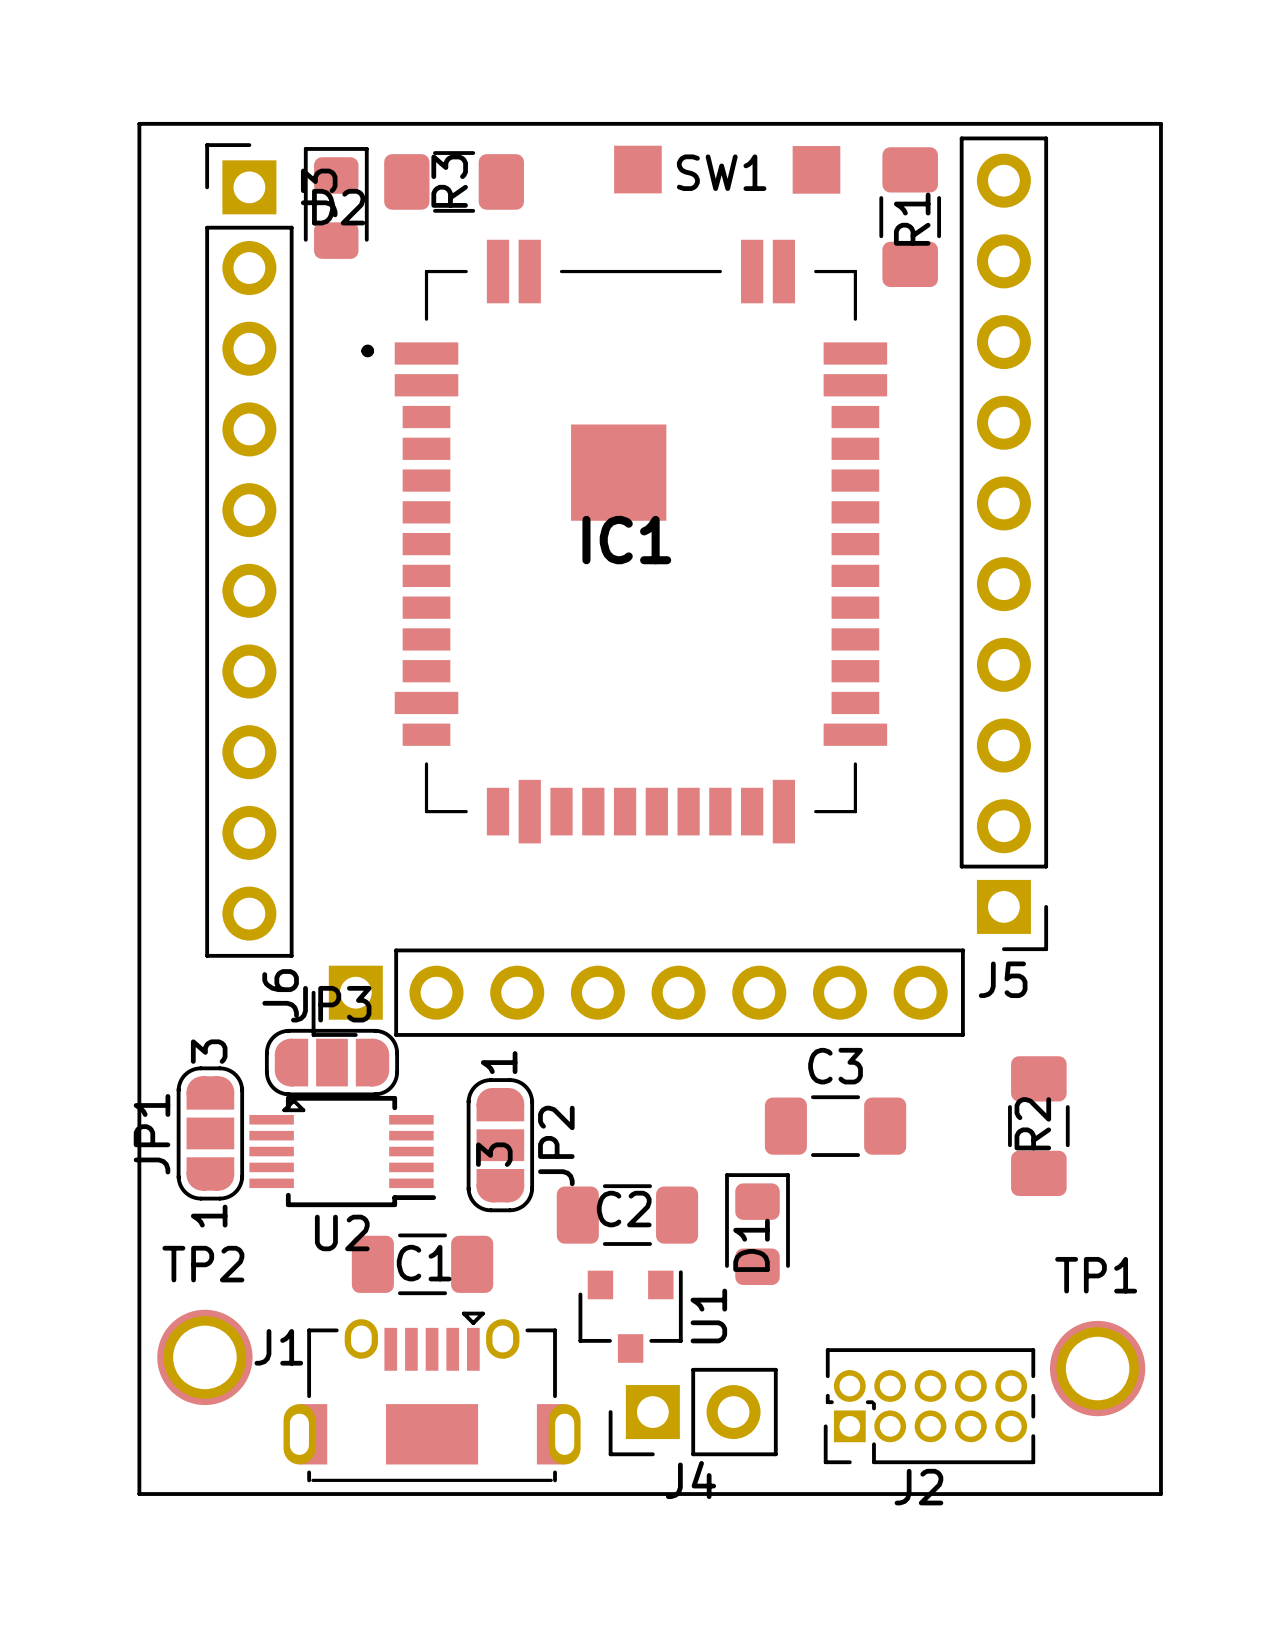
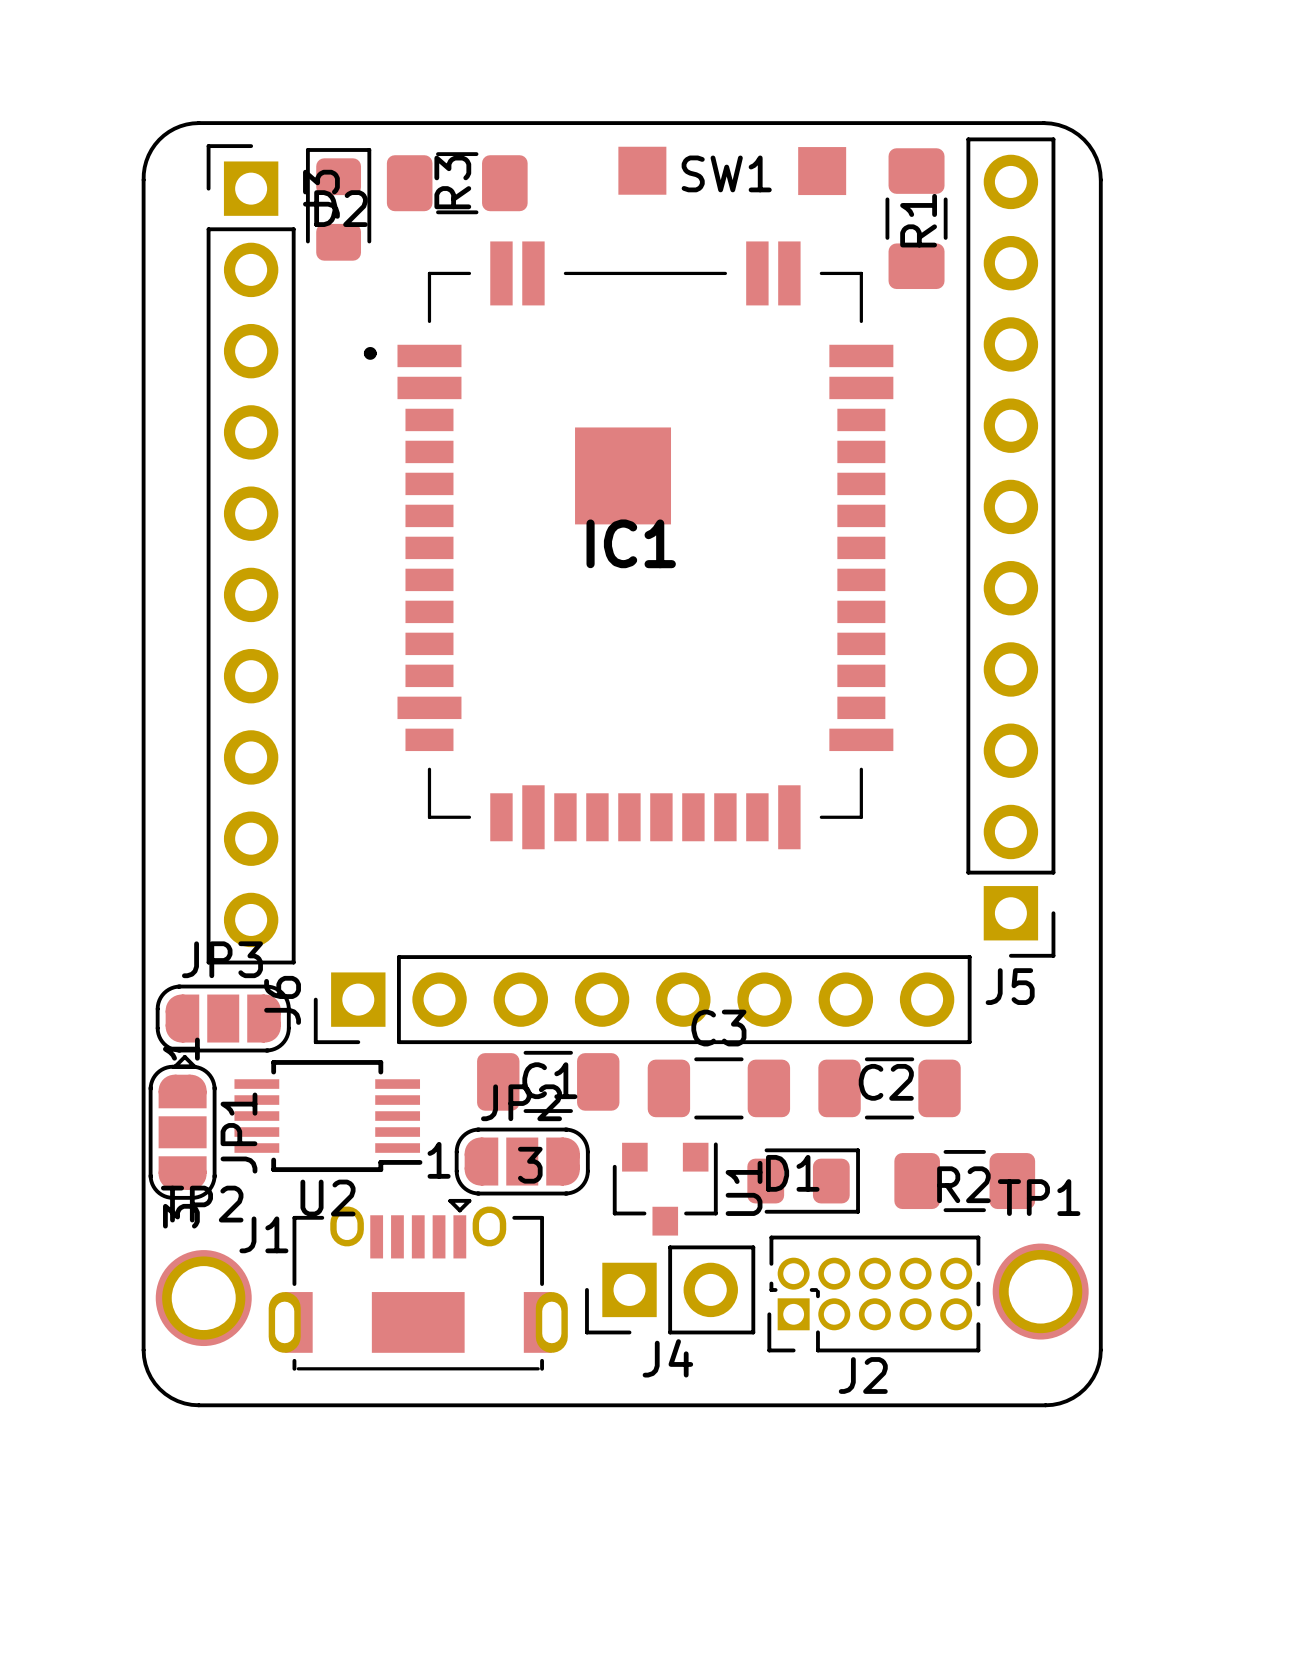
board edge: (139, 123) (139, 1494) (1160, 1494) (1160, 123) (139, 123) -> (198, 123) (174, 128) (159, 139) (148, 155) (143, 173) (143, 1350) (145, 1364) (155, 1383) (171, 1397) (184, 1403) (198, 1405) (1045, 1405) (1066, 1401) (1079, 1393) (1089, 1383) (1096, 1371) (1100, 1350) (1100, 179) (1096, 158) (1089, 145) (1072, 130) (1058, 125) (1043, 123) (198, 123)
JP3 position: (331, 1070) -> (223, 1026)
C3 position: (835, 1126) -> (718, 1088)
R2 rotation: 0° (1038, 1126) -> 90° clockwise (964, 1181)
R2 position: (1038, 1126) -> (964, 1181)
JP1 rotation: 0° (210, 1133) -> 180° (182, 1132)
JP2 rotation: 0° (500, 1145) -> 90° counterclockwise (522, 1161)
U2 position: (342, 1151) -> (328, 1116)
C2 position: (627, 1215) -> (889, 1088)
D1 rotation: 0° (757, 1229) -> 90° clockwise (803, 1181)
D1 position: (757, 1229) -> (803, 1181)
C1 position: (422, 1264) -> (548, 1081)
U1 position: (630, 1316) -> (665, 1189)
TP2 position: (204, 1357) -> (203, 1298)
TP1 position: (1097, 1368) -> (1040, 1291)
J1 position: (432, 1396) -> (418, 1284)
J2 position: (929, 1406) -> (873, 1293)
J4 position: (693, 1412) -> (670, 1289)

